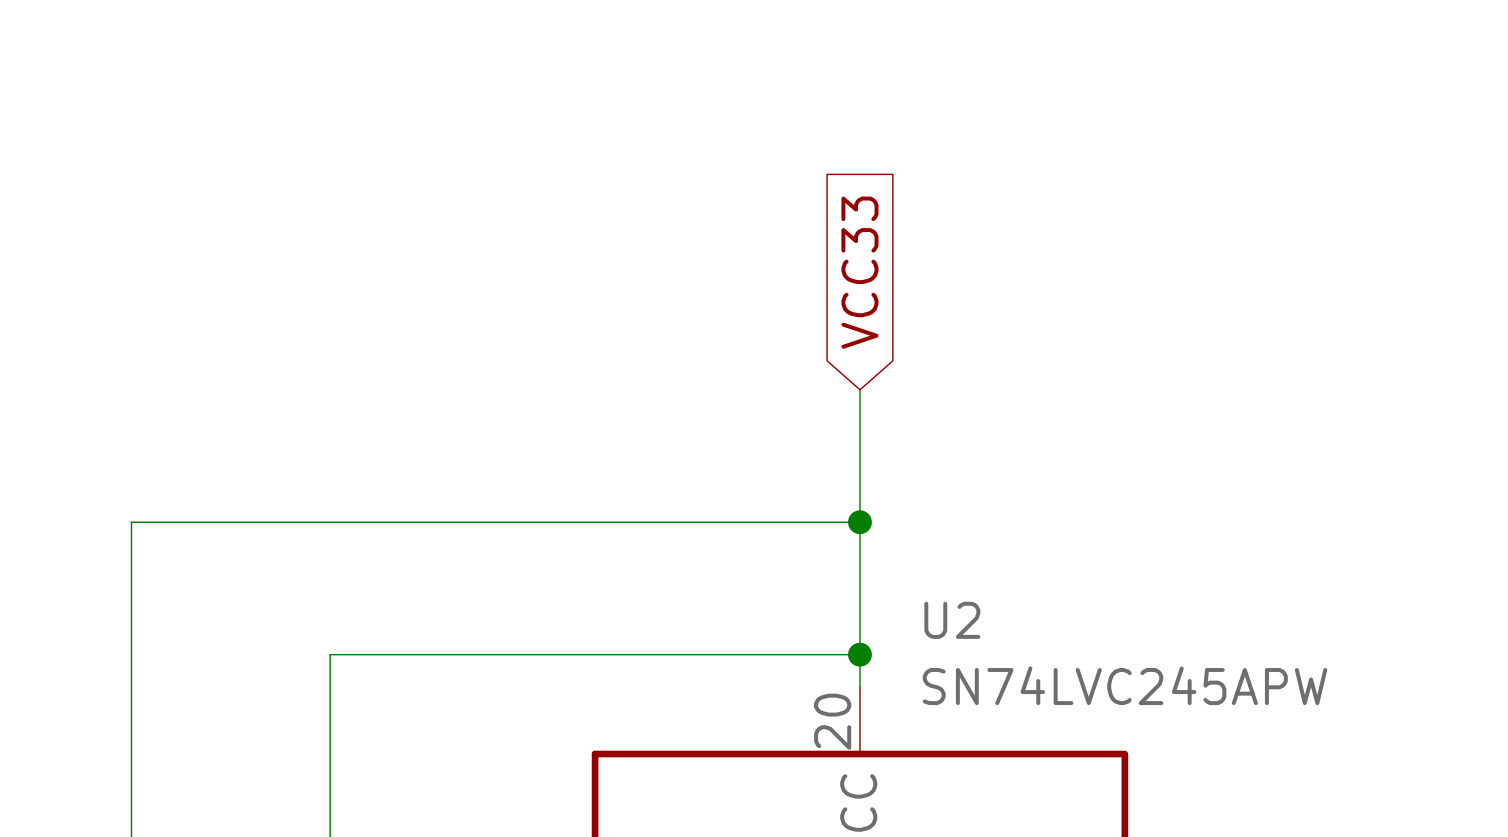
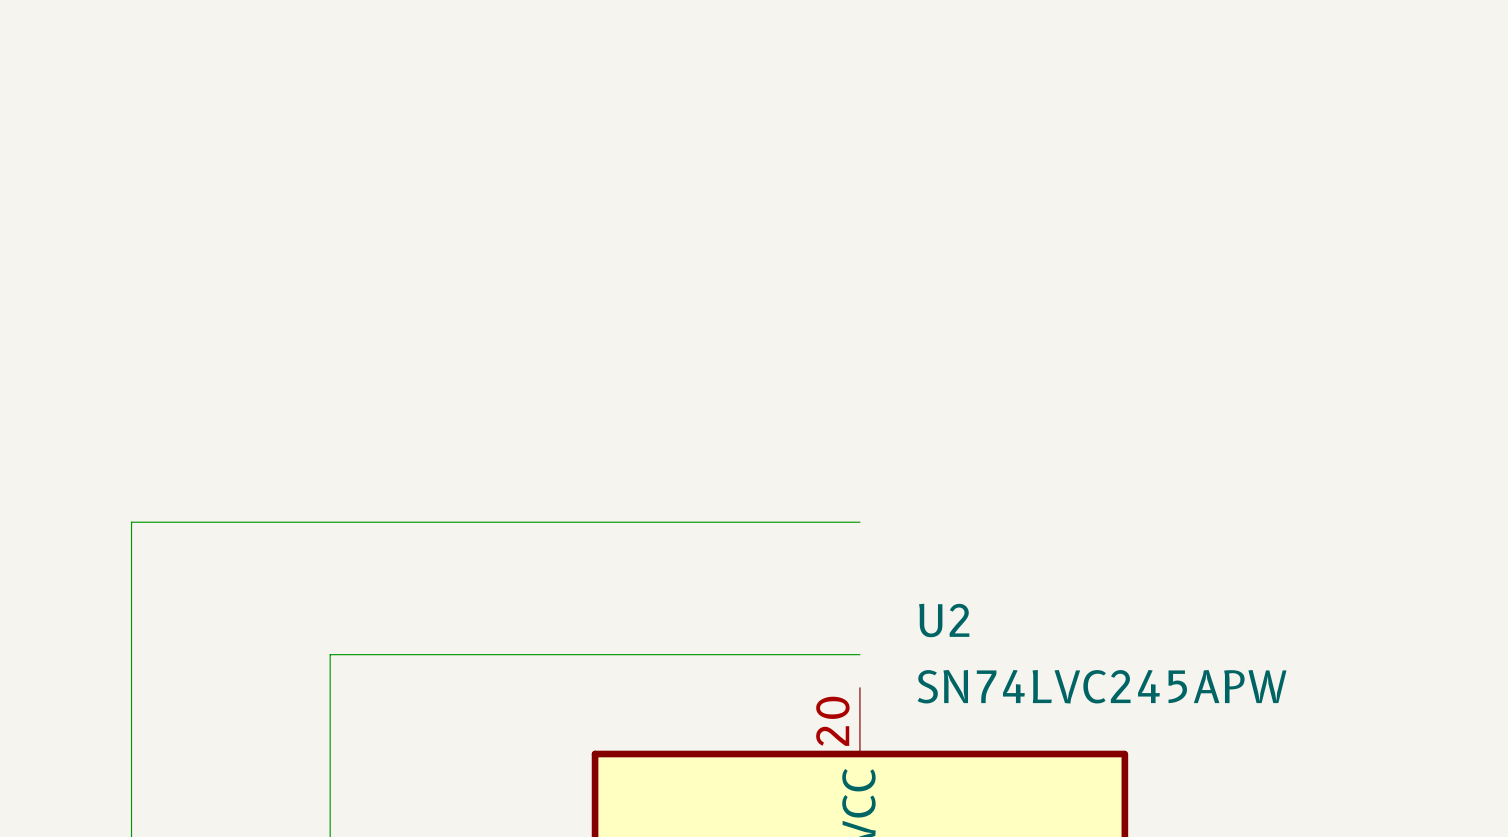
global label: VCC33 (859, 272) -> none
wire: (859, 389) (859, 687) -> none
junction: (859, 522) -> none
junction: (859, 654) -> none

